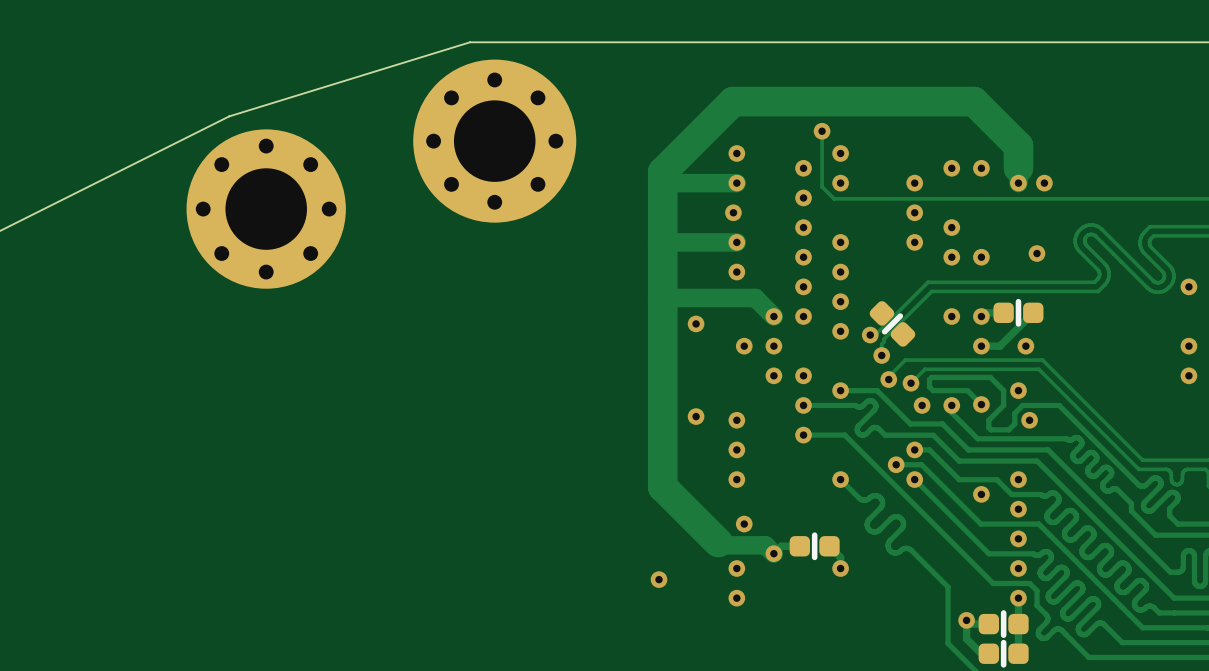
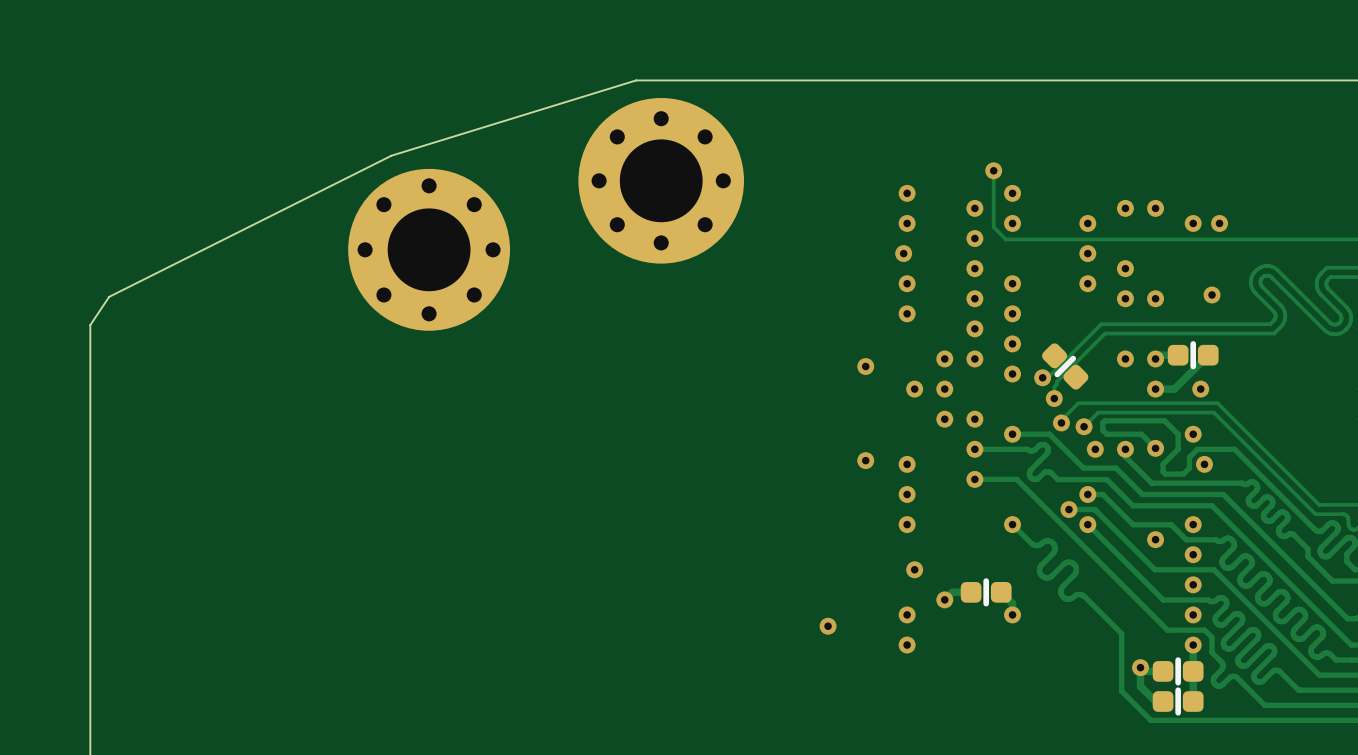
track: (662, 172) (673, 183) (736, 183) -> none
track: (662, 172) (733, 101) (974, 101) (1018, 146) (1018, 183) -> none
track: (662, 172) (662, 486) (721, 545) (765, 545) (773, 553) -> none
track: (736, 242) (662, 242) -> none
track: (662, 297) (755, 297) (773, 316) -> none

